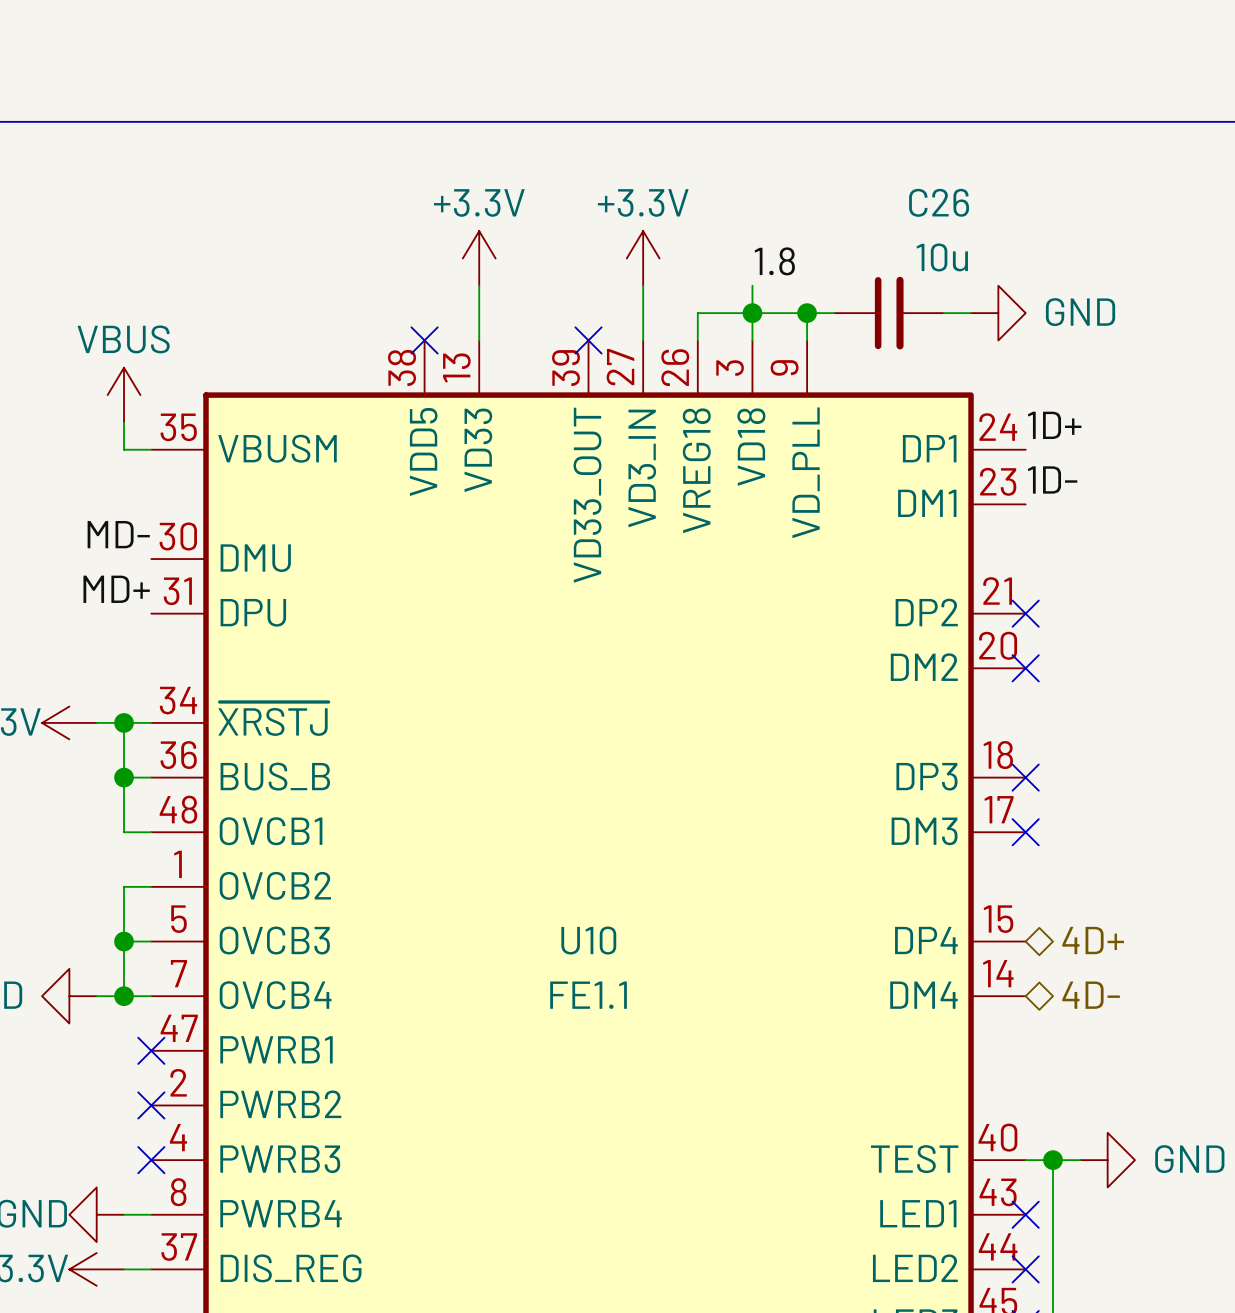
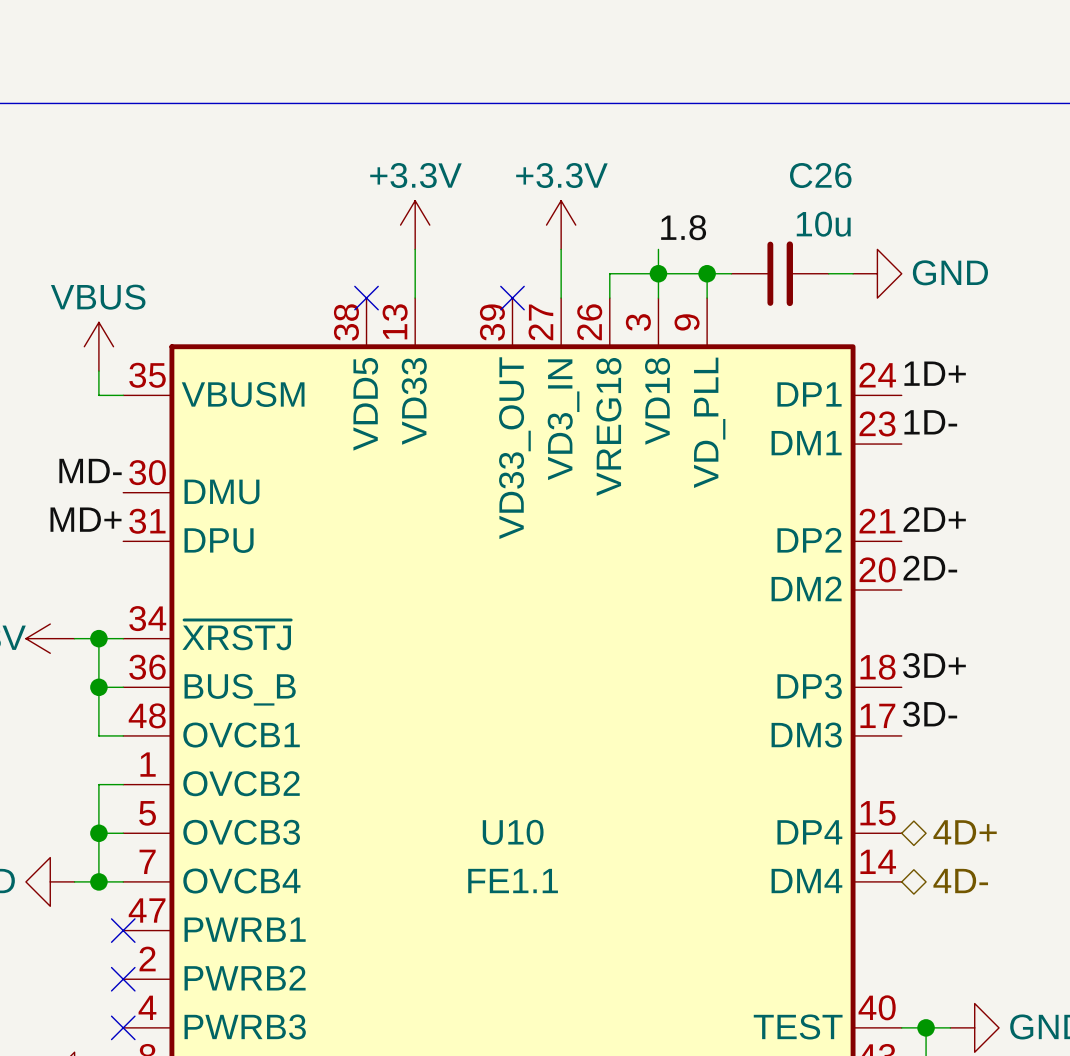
label: none -> 2D+ (934, 519)
no-connect mark: (1025, 613) -> none
label: none -> 2D- (930, 568)
no-connect mark: (1025, 668) -> none
label: none -> 3D+ (934, 665)
no-connect mark: (1025, 777) -> none
label: none -> 3D- (930, 714)
no-connect mark: (1025, 832) -> none

